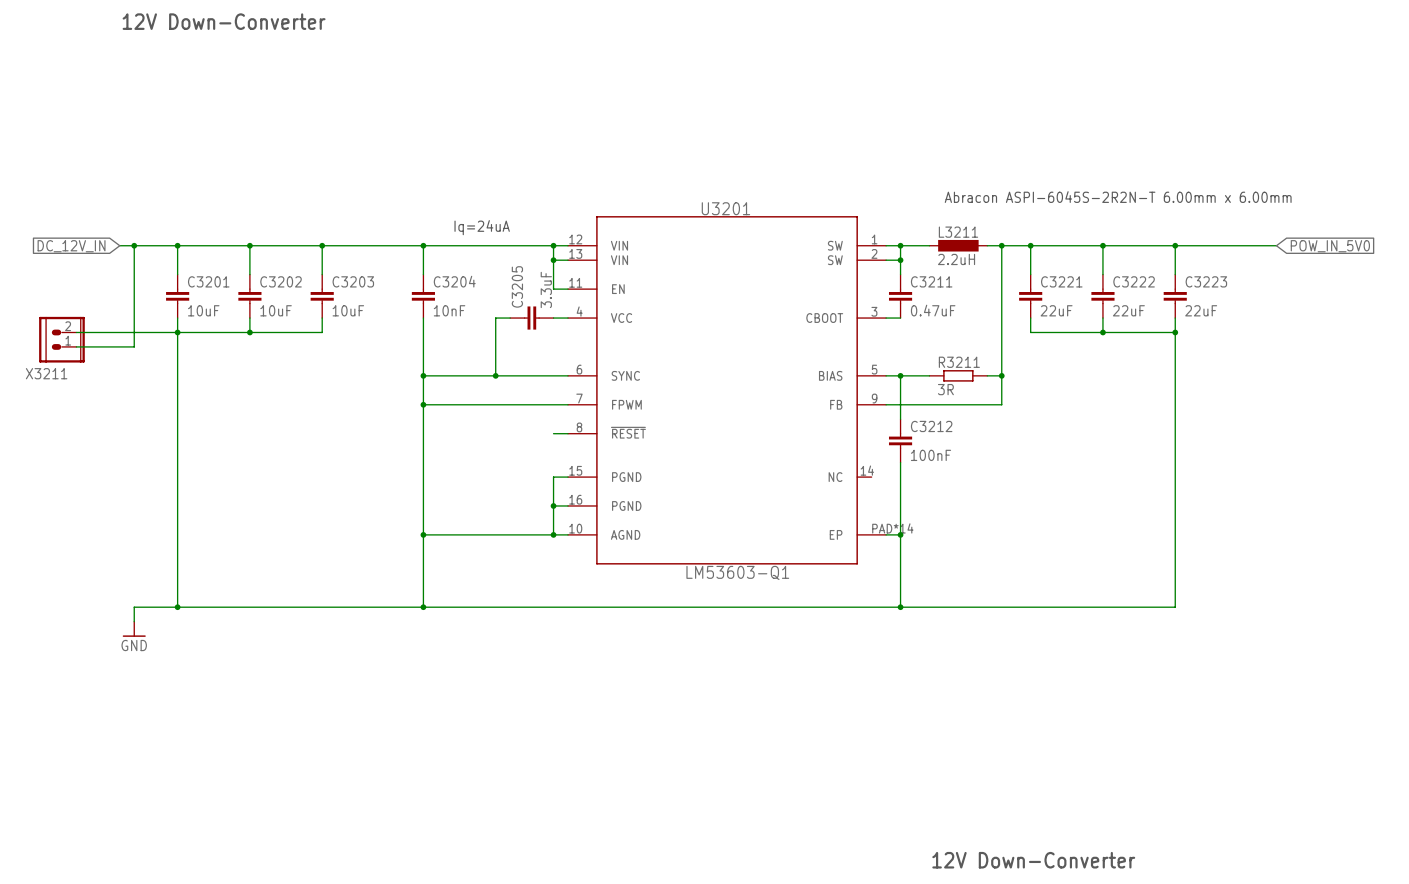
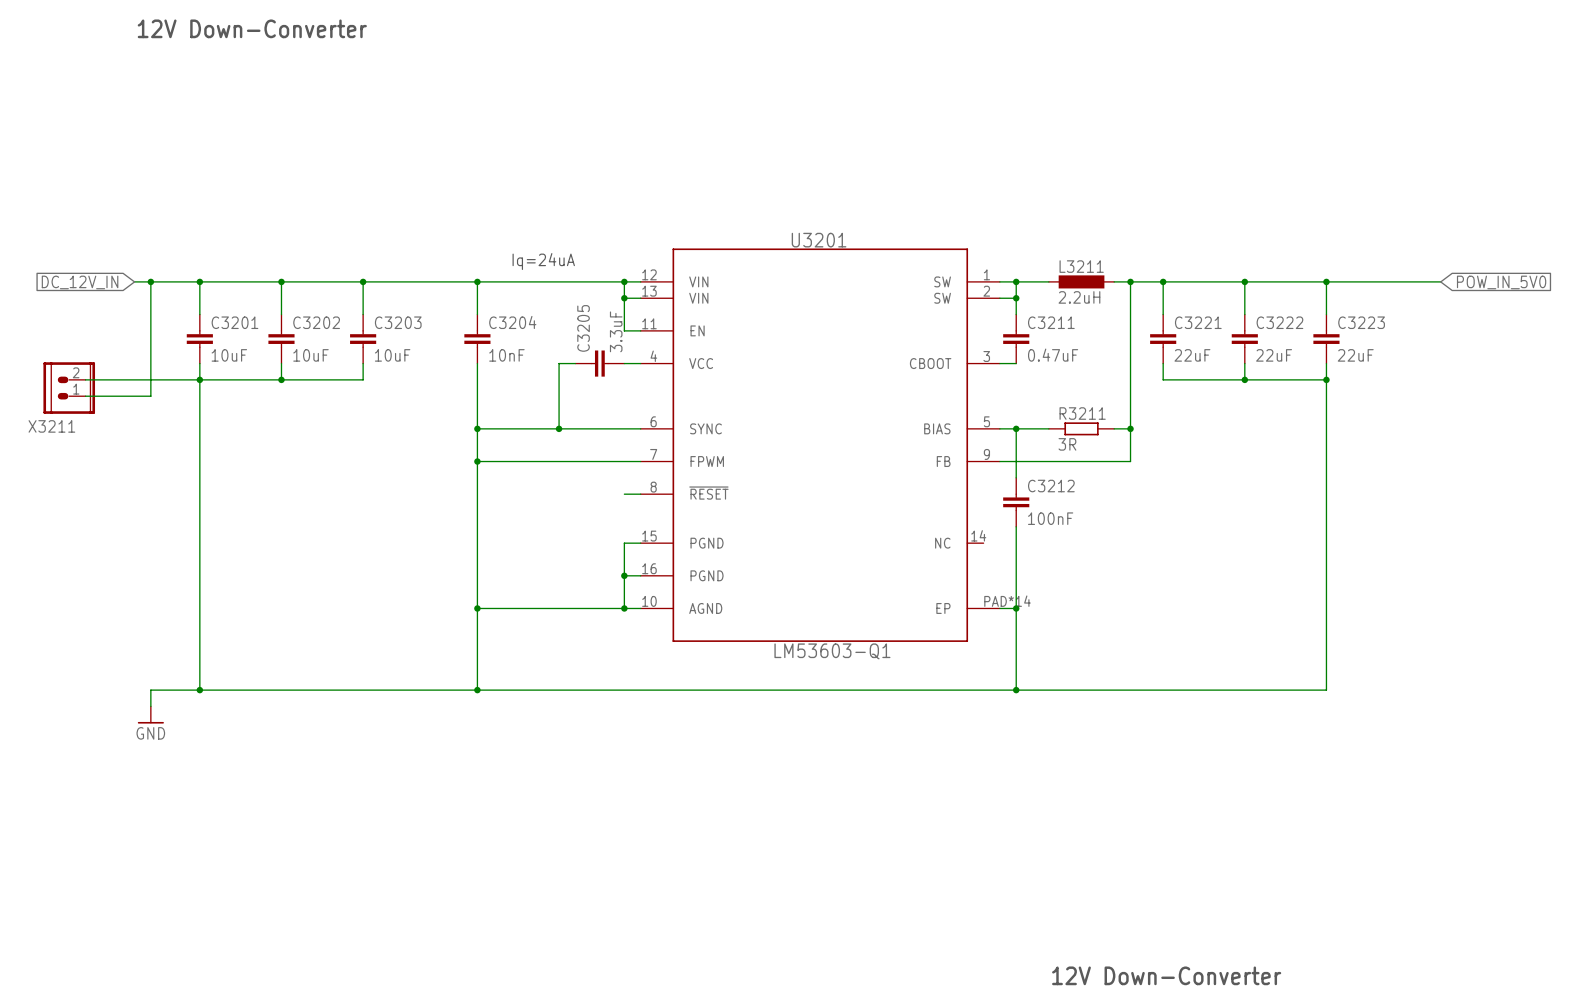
text: Abracon ASPI-6045S-2R2N-T 6.00mm x 6.00mm (1118, 197) -> none

